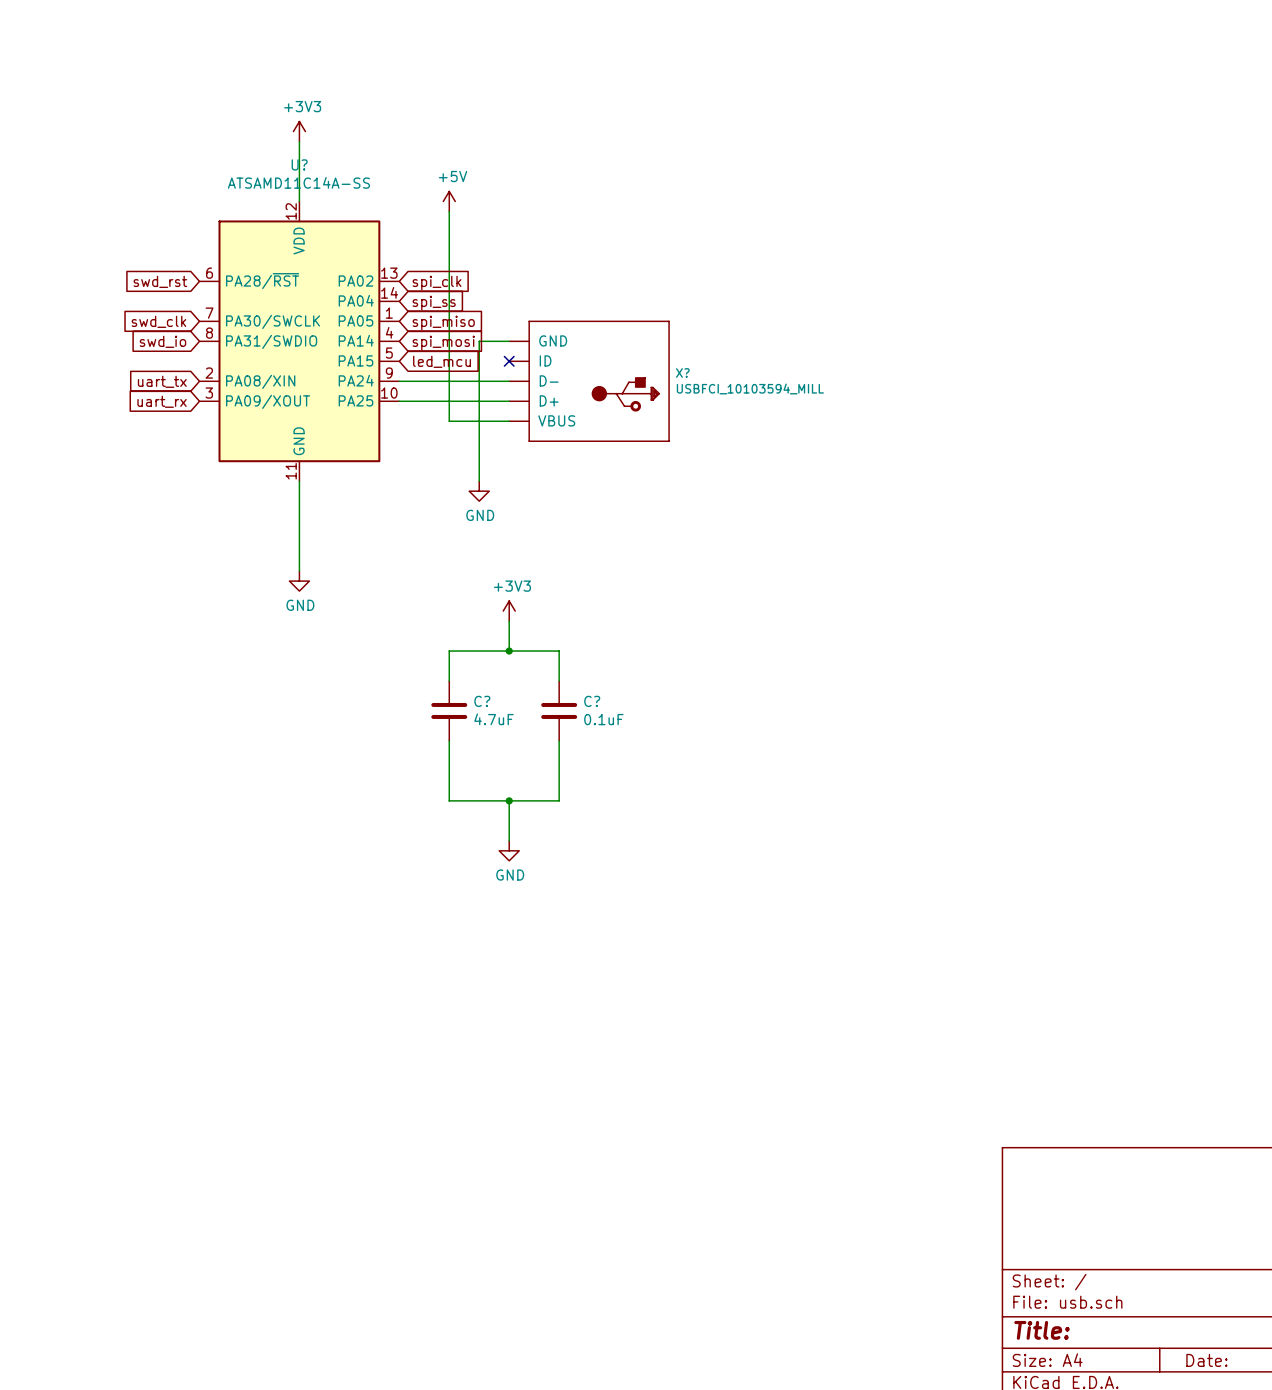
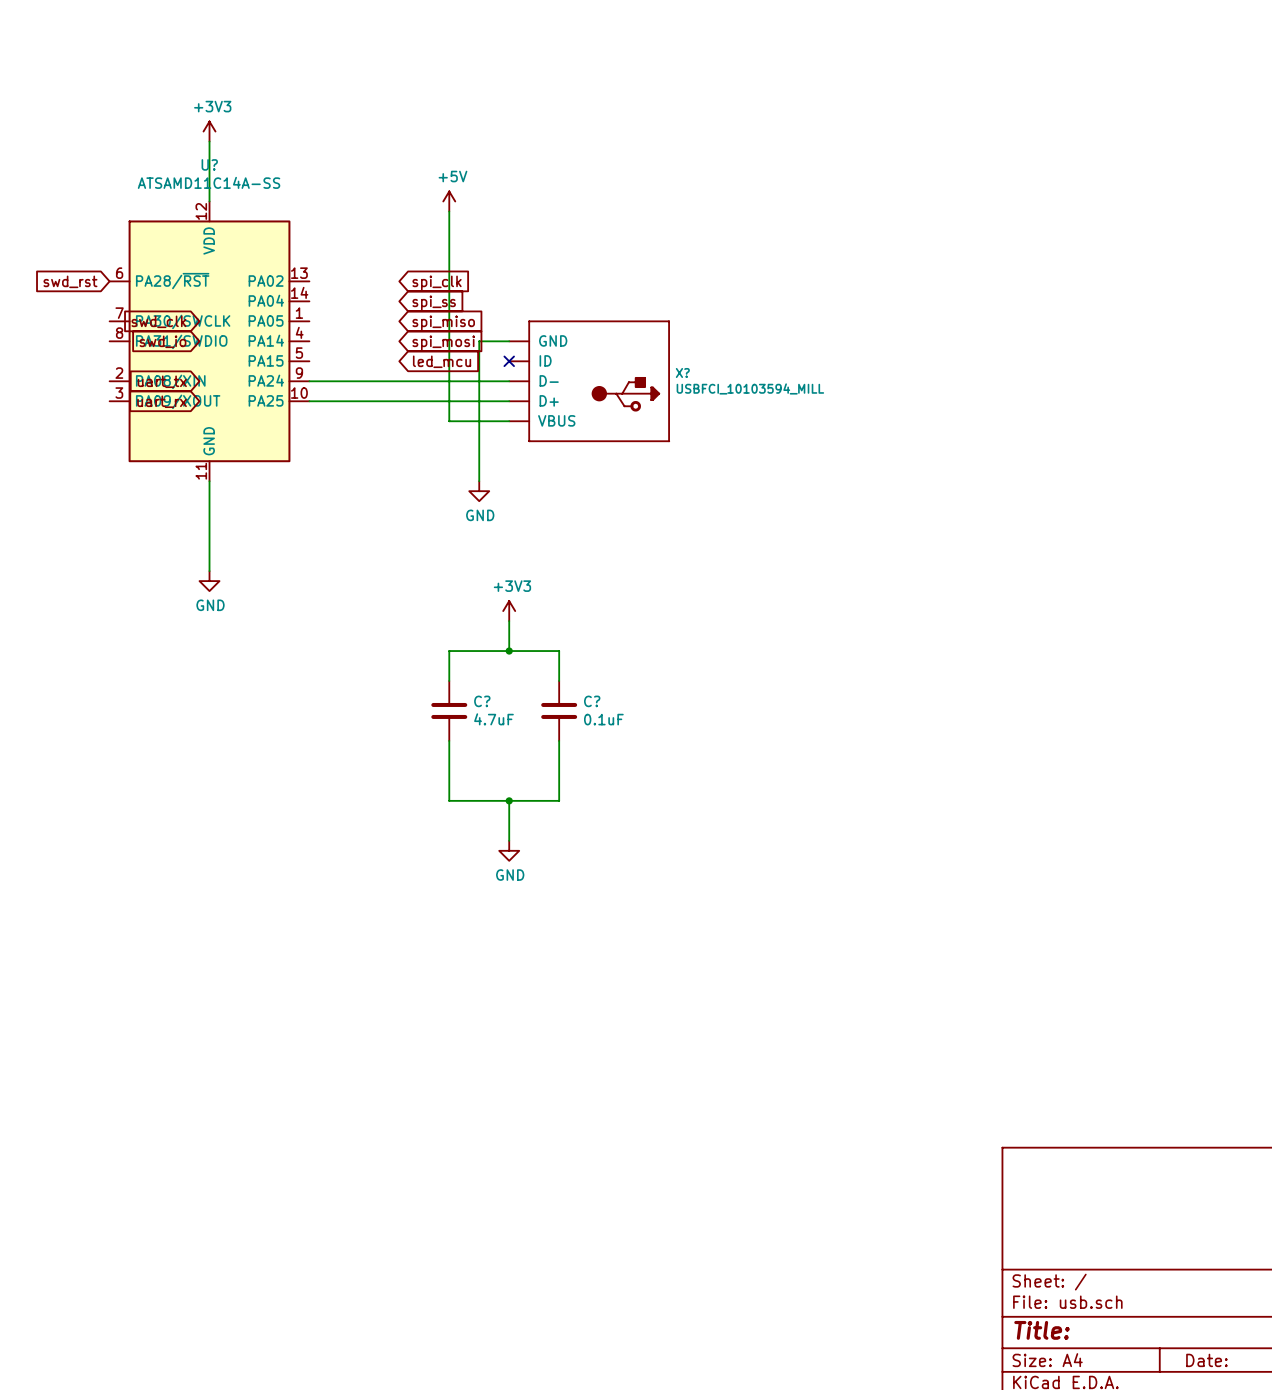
power symbol position: +3V3 (299, 131) -> +3V3 (209, 131)
wire: (299, 141) (299, 201) -> (209, 141) (209, 201)
global label position: swd_rst (160, 281) -> swd_rst (70, 281)
U? position: (299, 341) -> (209, 341)
wire: (299, 481) (299, 571) -> (209, 481) (209, 571)
power symbol position: GND (299, 581) -> GND (209, 581)

